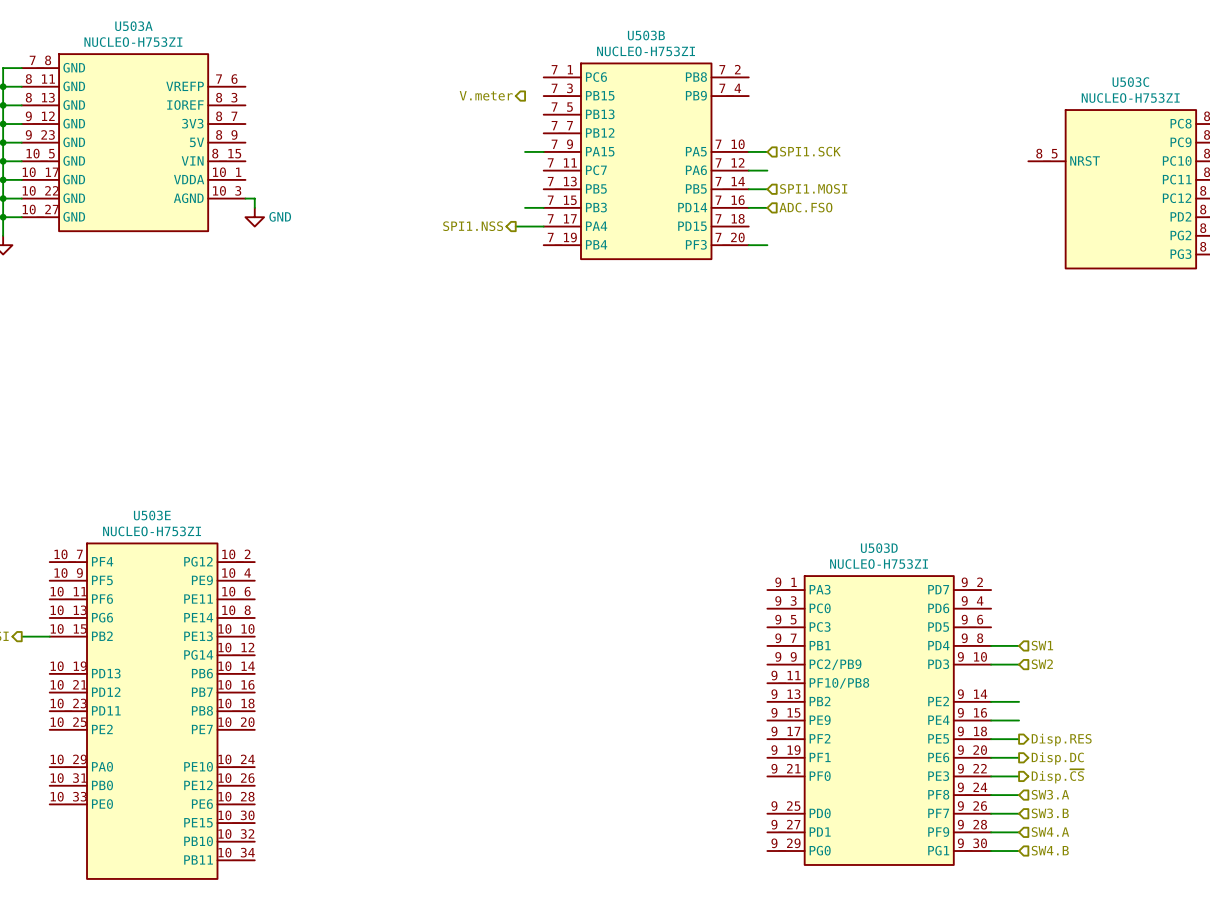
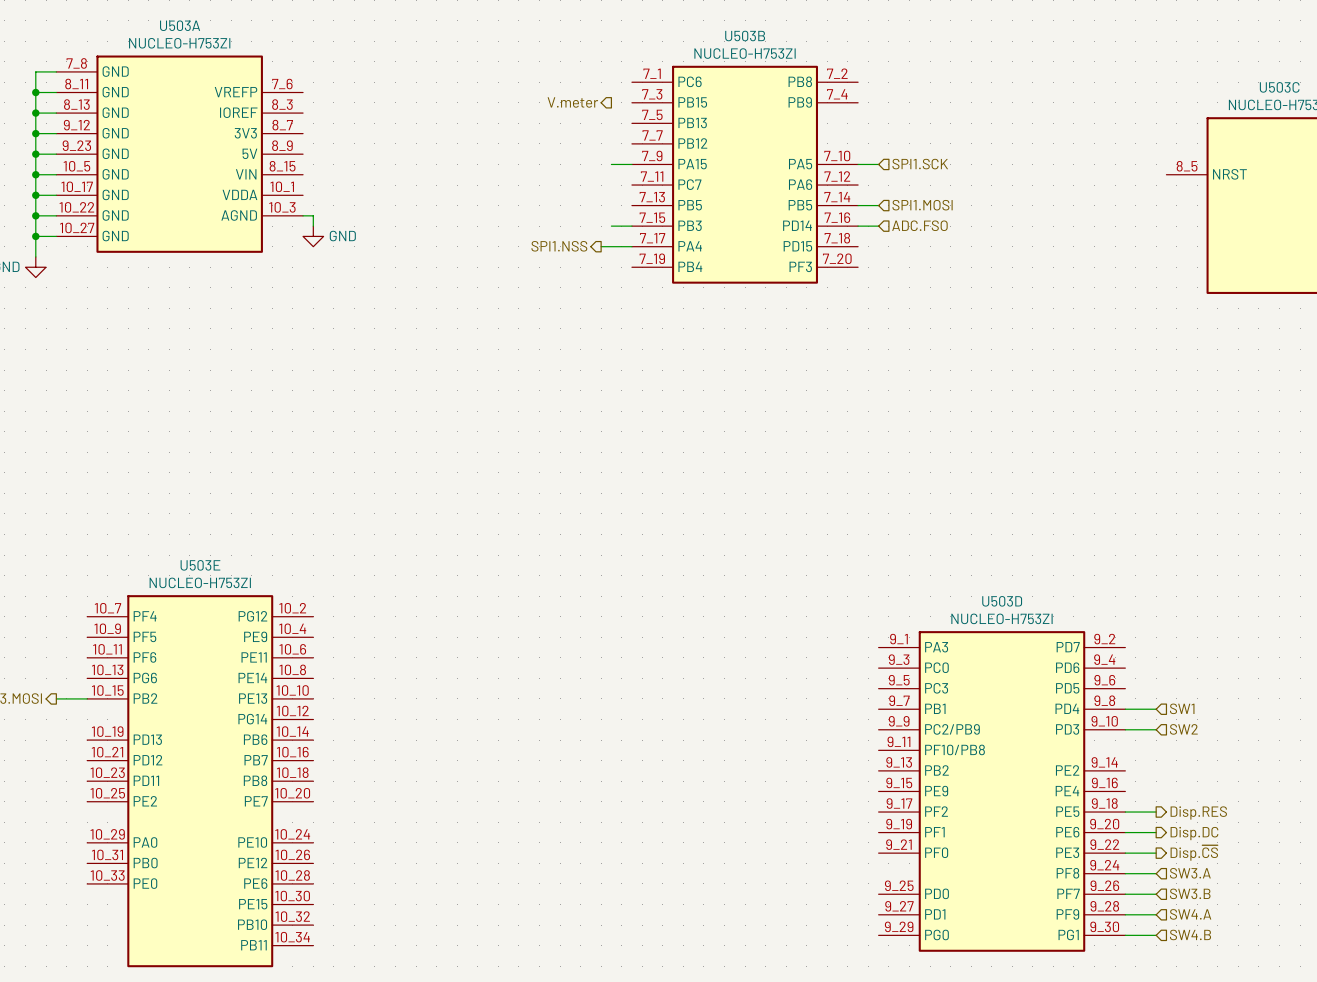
wire: (748, 170) (767, 170) -> none
wire: (748, 245) (767, 245) -> none
wire: (991, 701) (1019, 701) -> none
wire: (991, 720) (1019, 720) -> none

